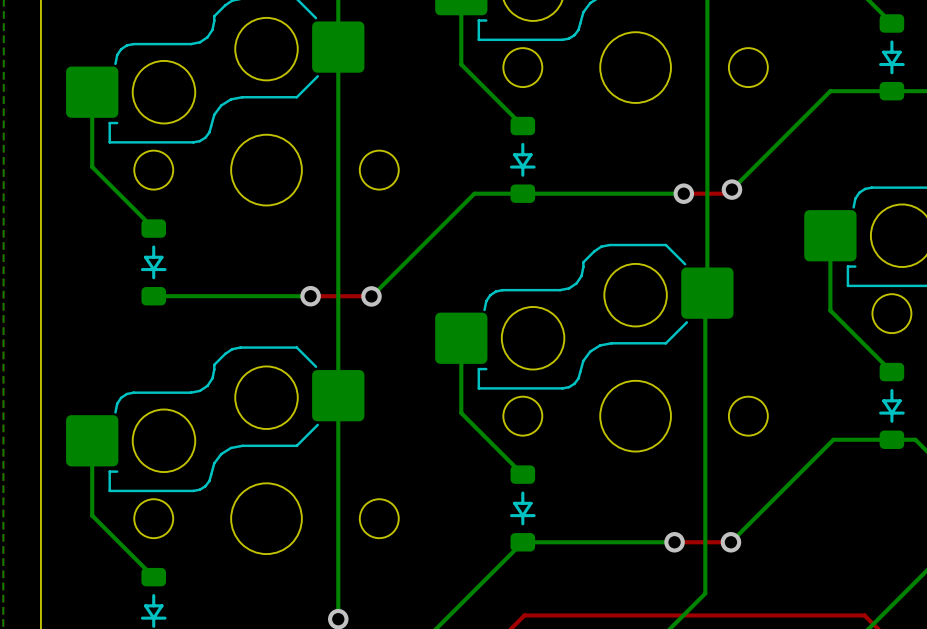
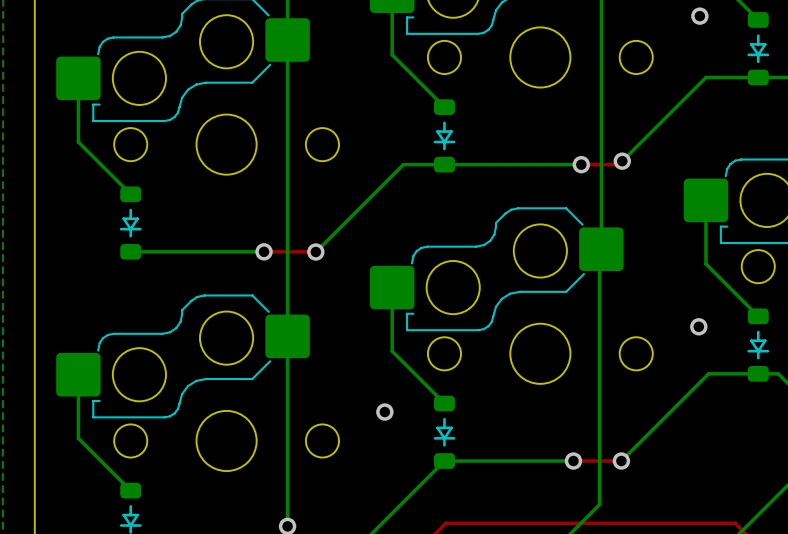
via: none -> (699, 16)
via: none -> (698, 326)
via: none -> (384, 412)

